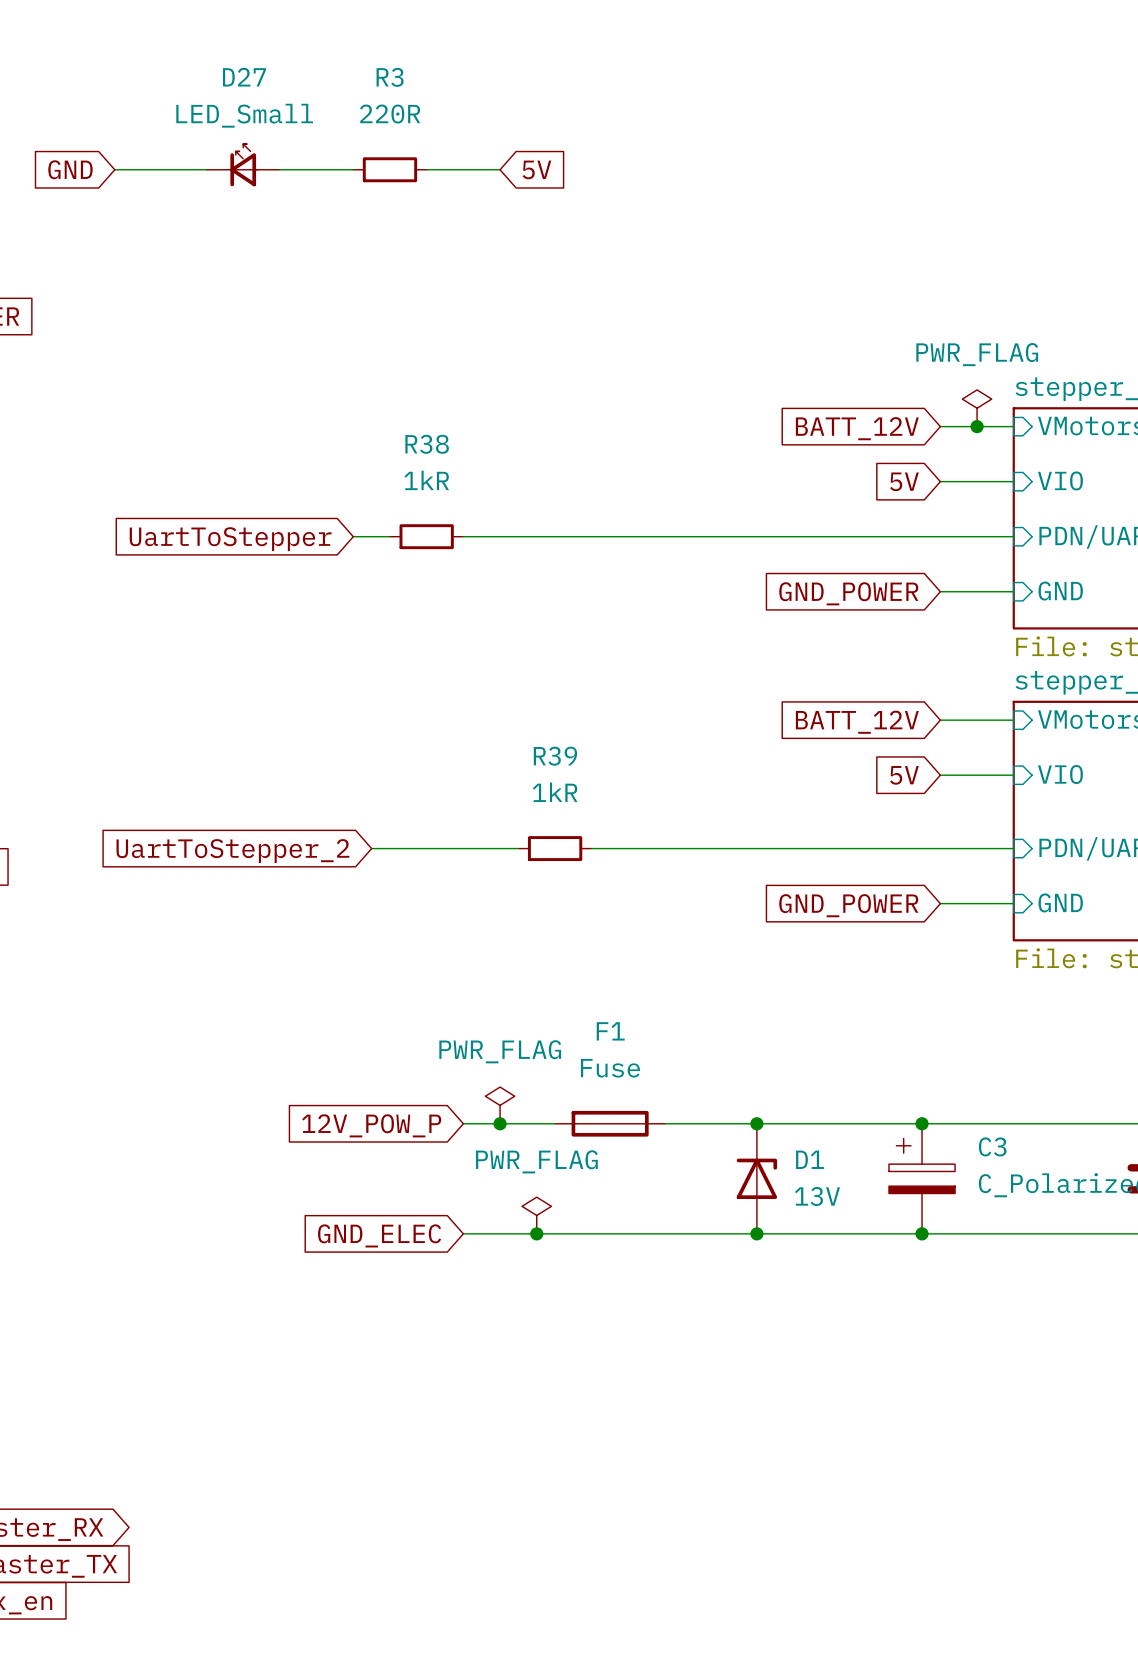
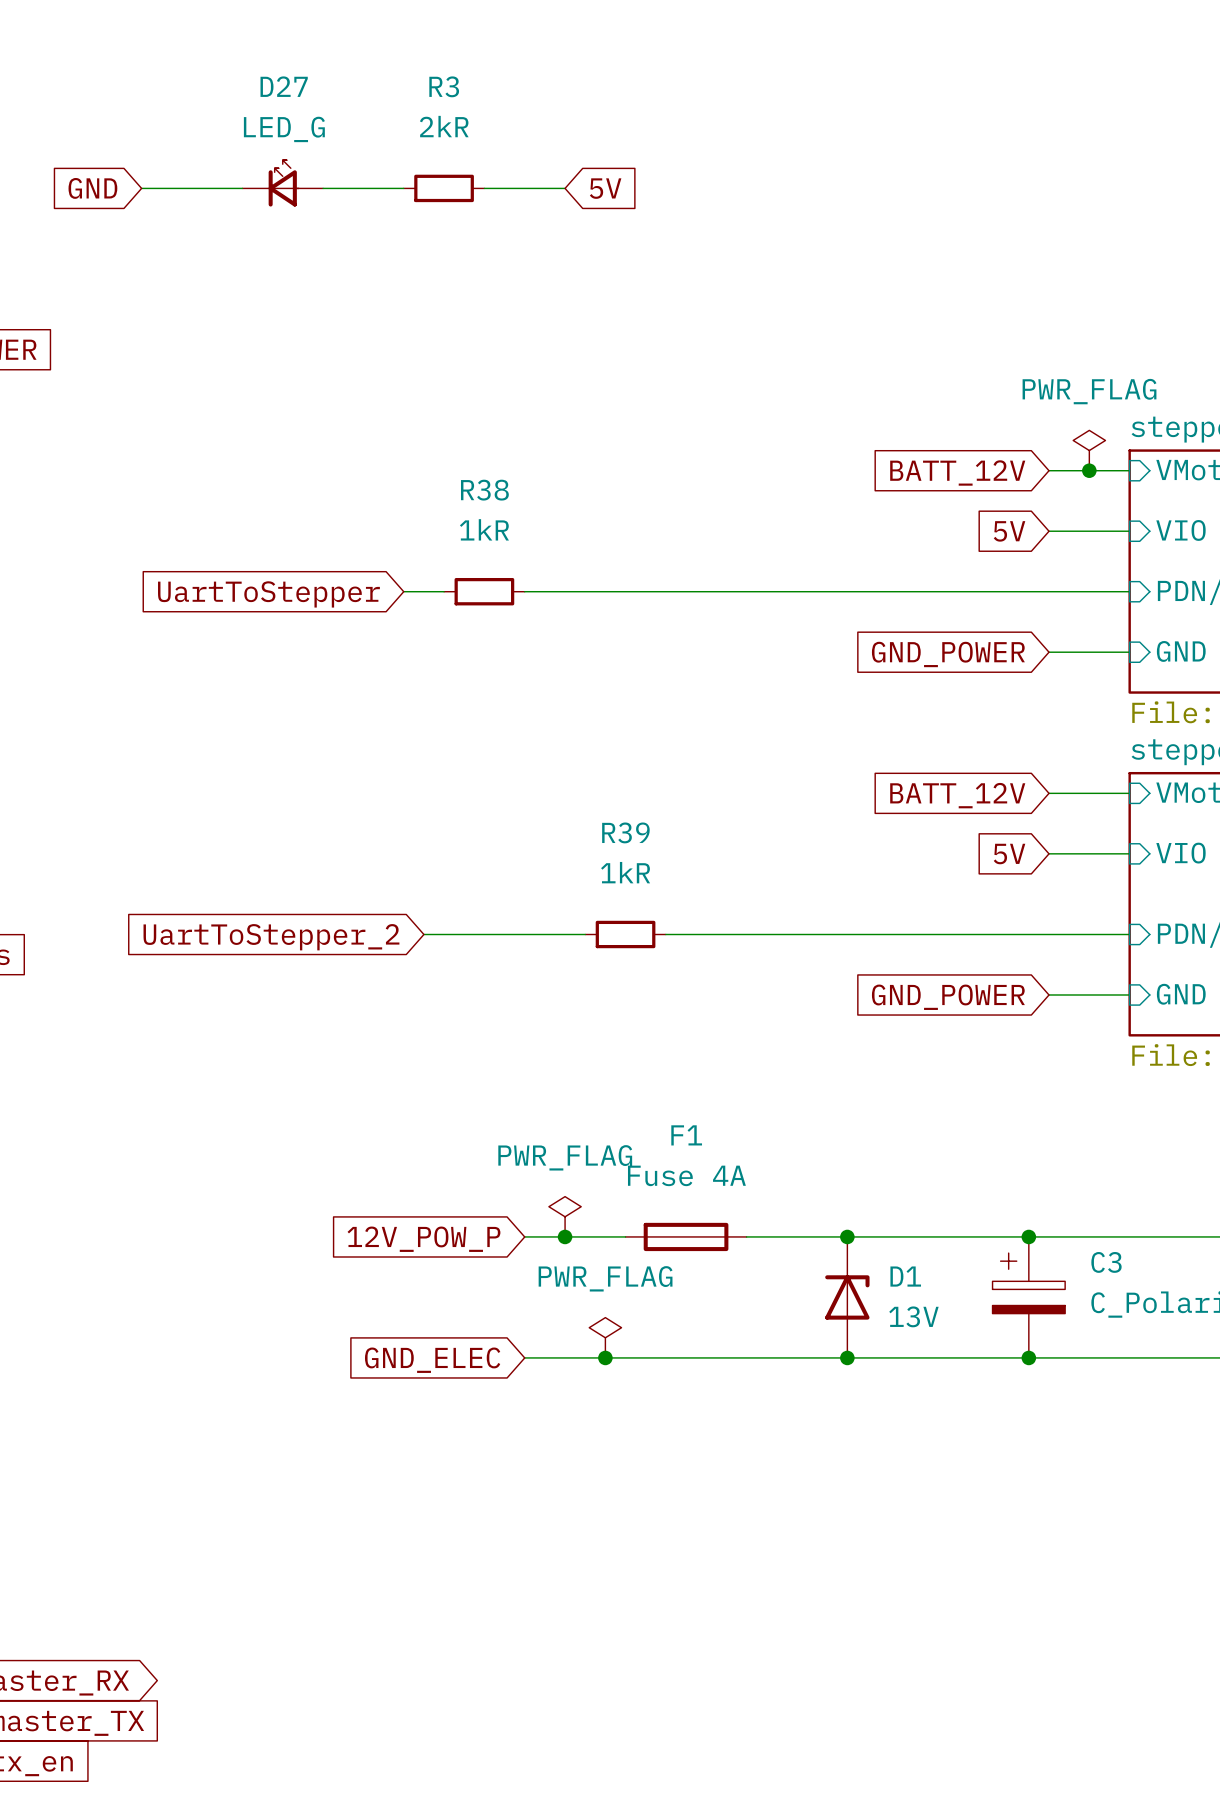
R3 value: 220R (390, 114) -> 2kR (444, 126)
D27 value: LED_Small (244, 115) -> LED_G (284, 129)
F1 value: Fuse (610, 1068) -> Fuse 4A (686, 1175)

